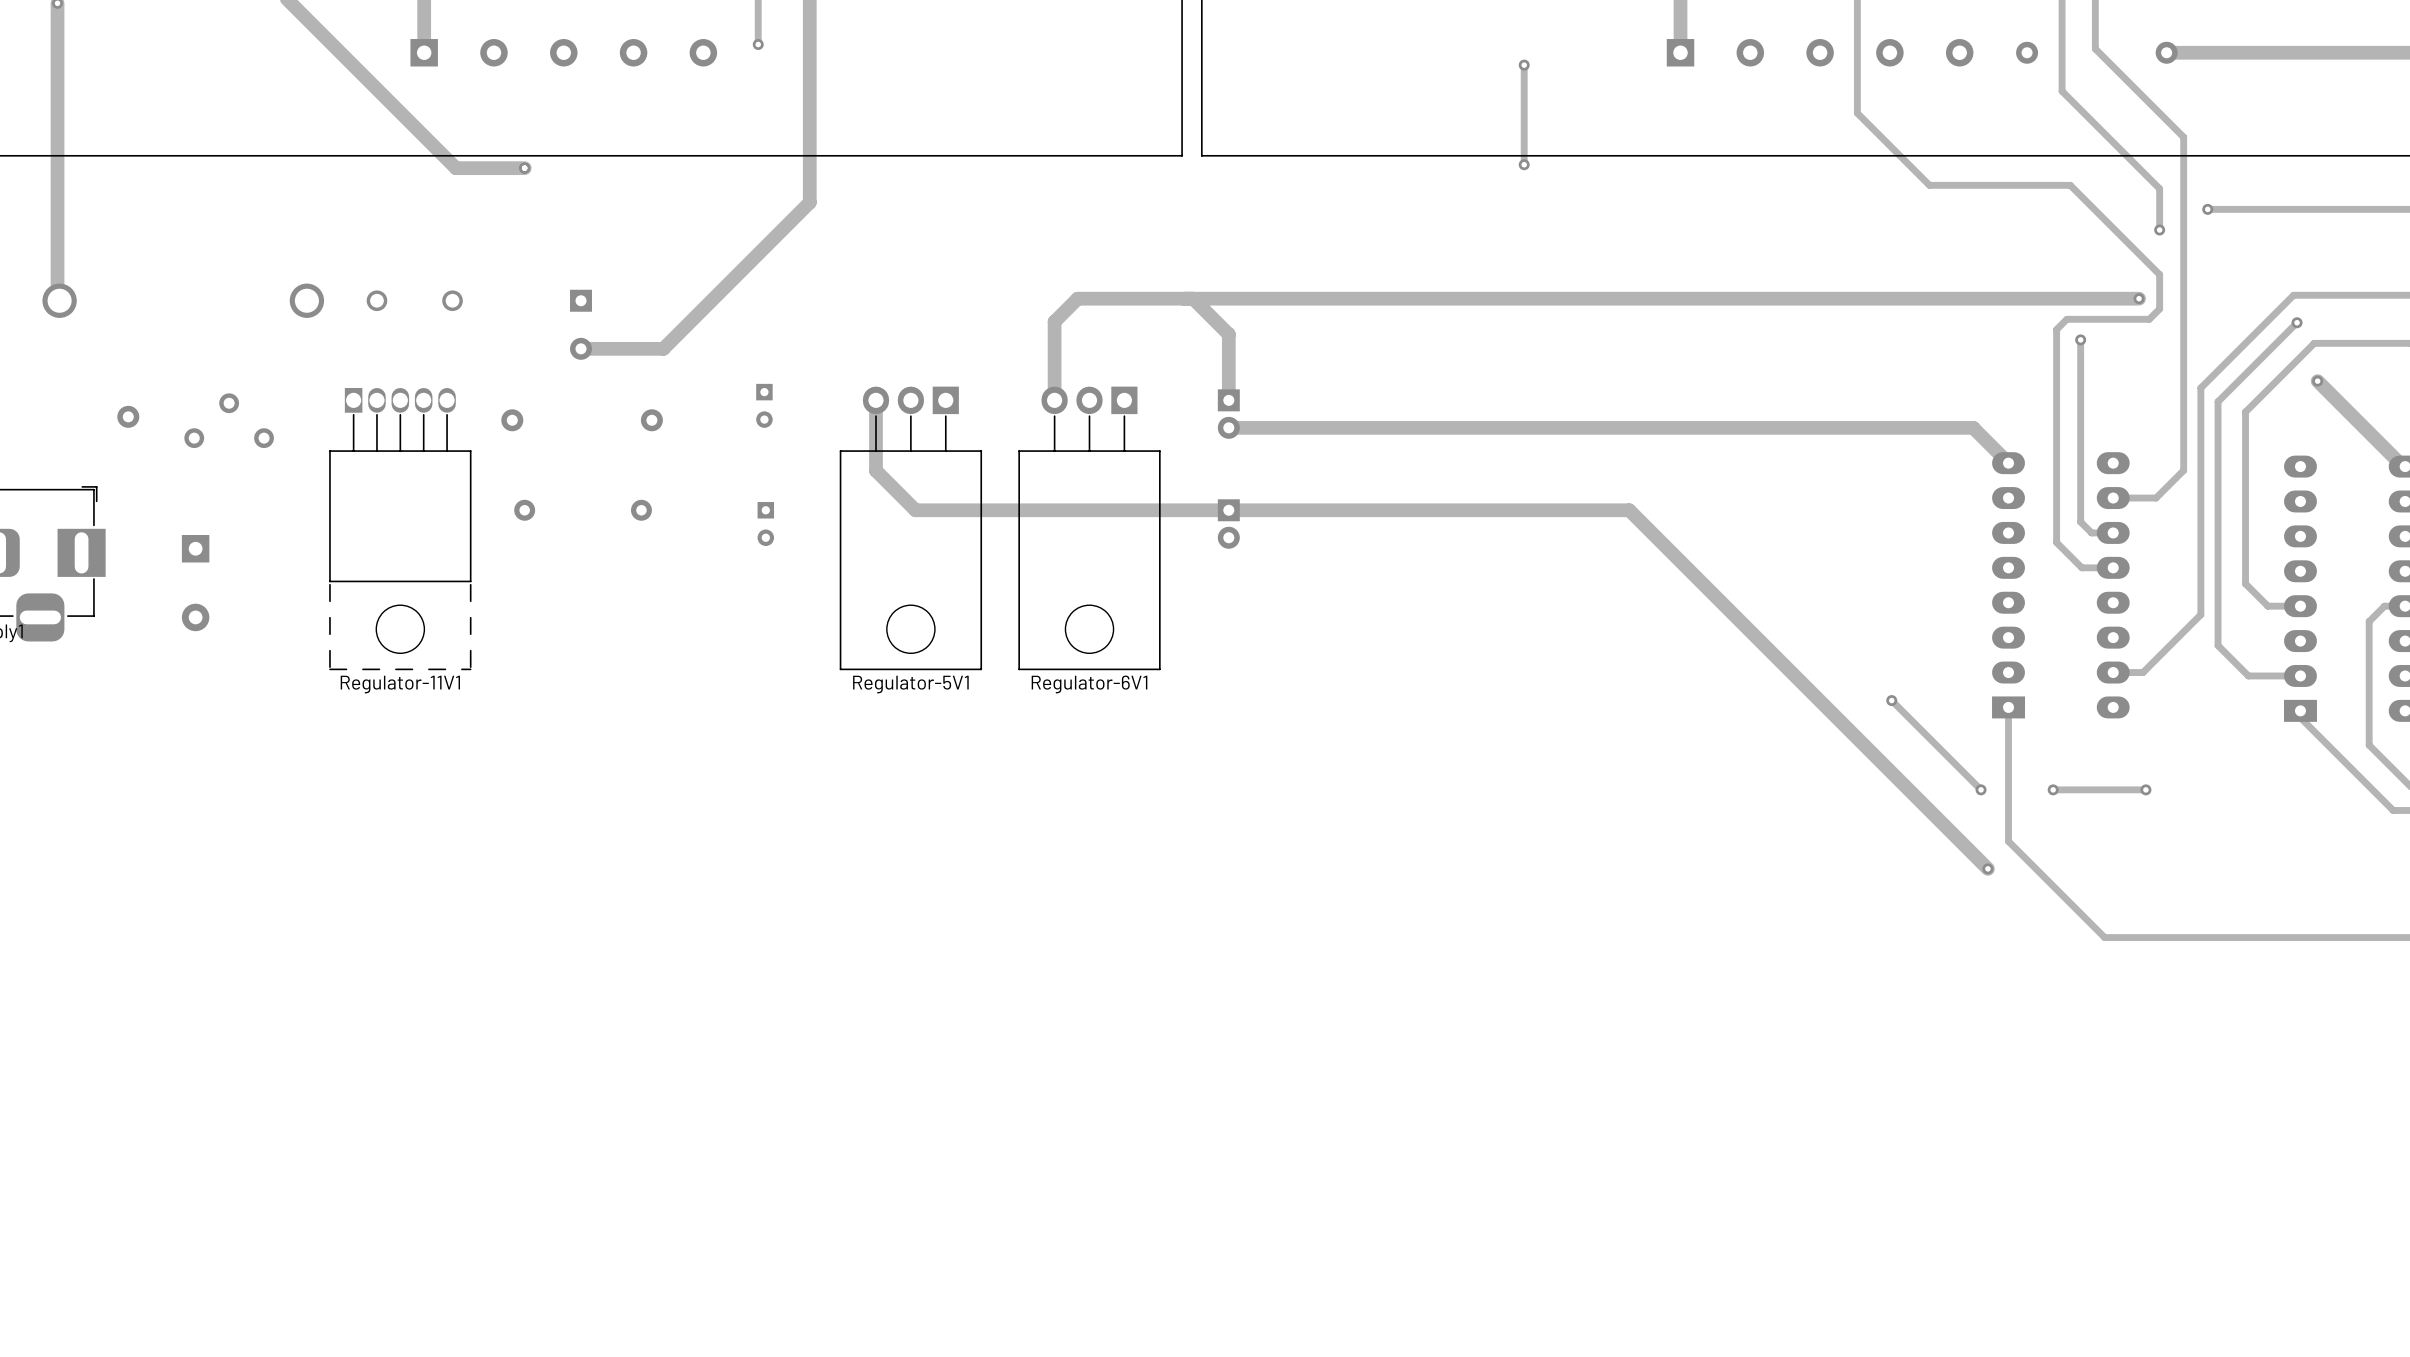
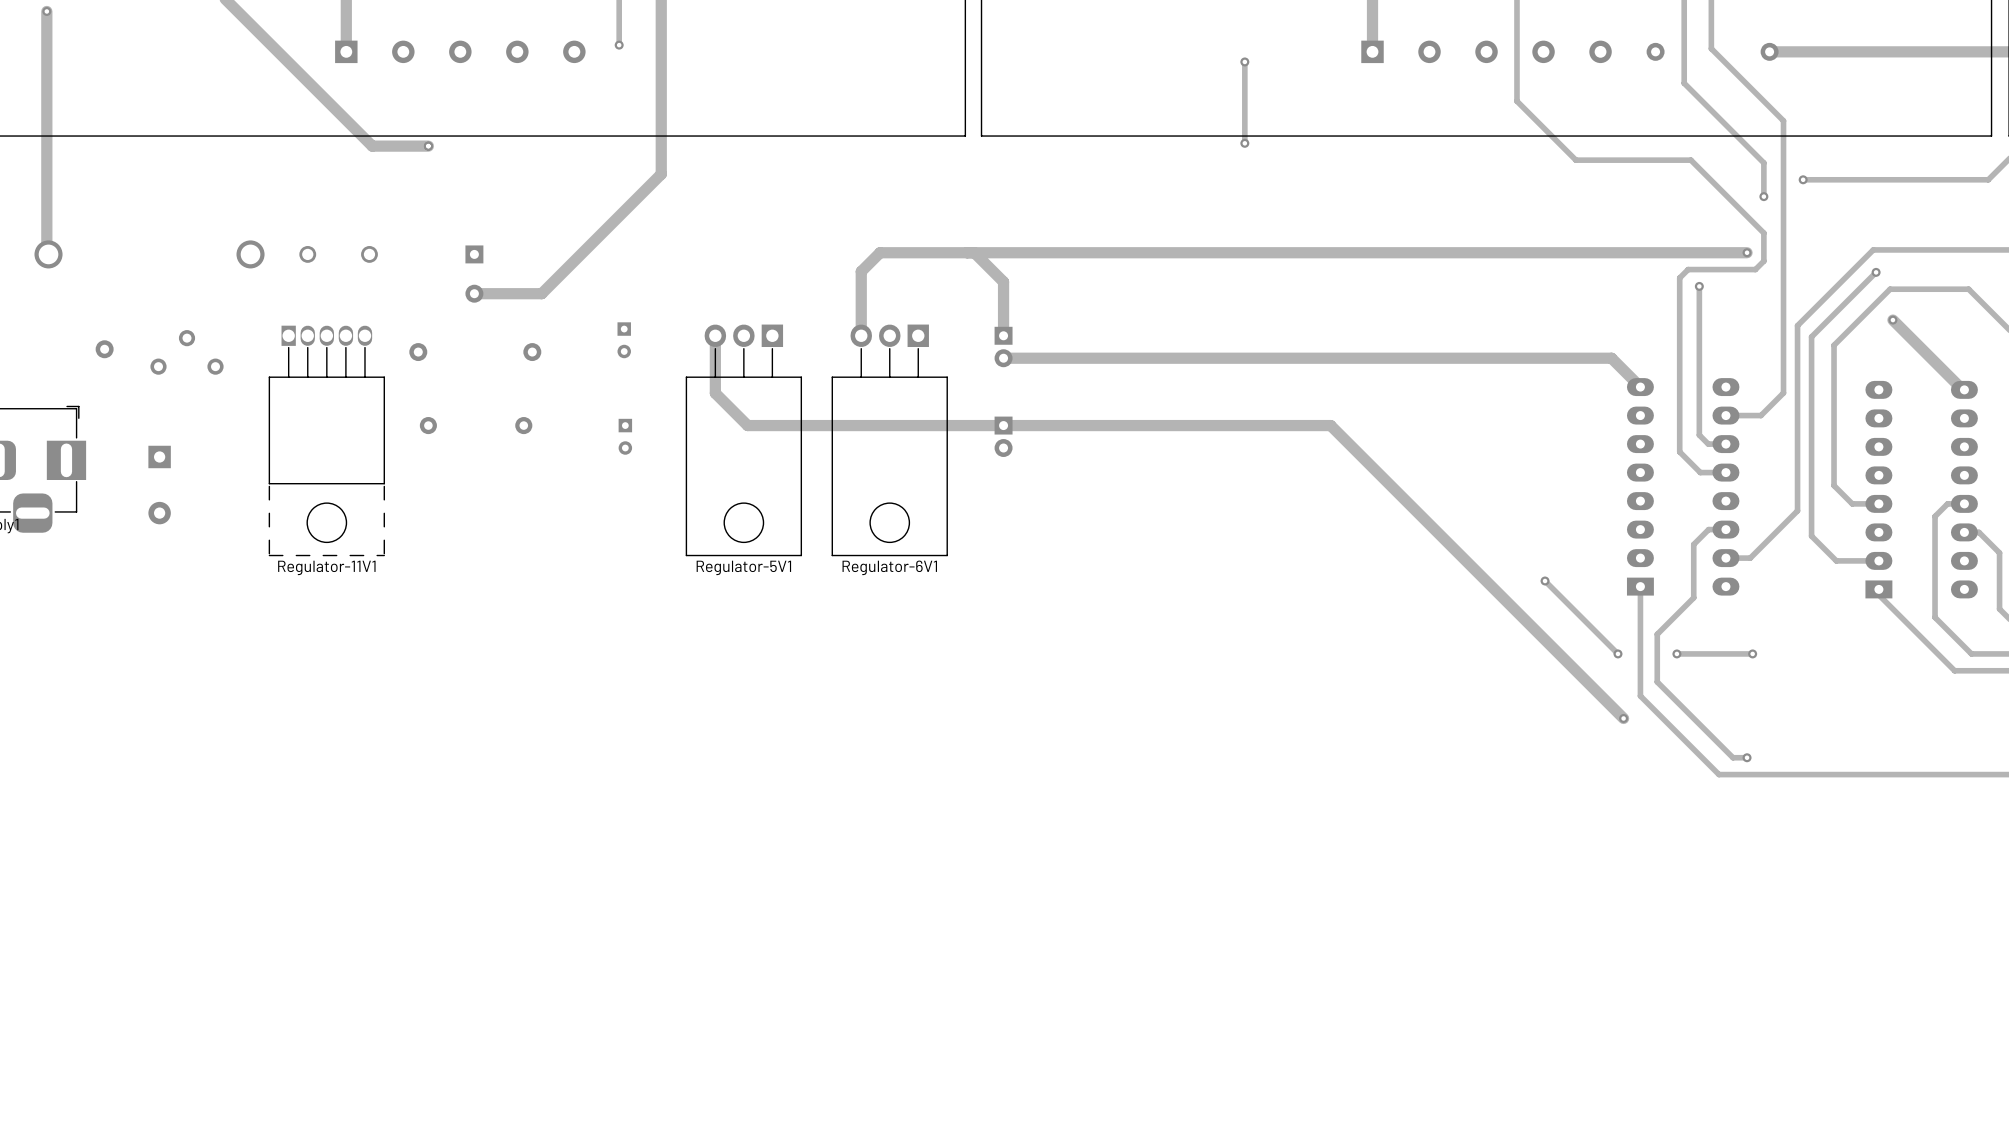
track: none -> (1725, 529) (1708, 529) (1693, 544) (1693, 597) (1657, 634) (1657, 682) (1733, 757) (1747, 757)
via: none -> (1747, 757)

